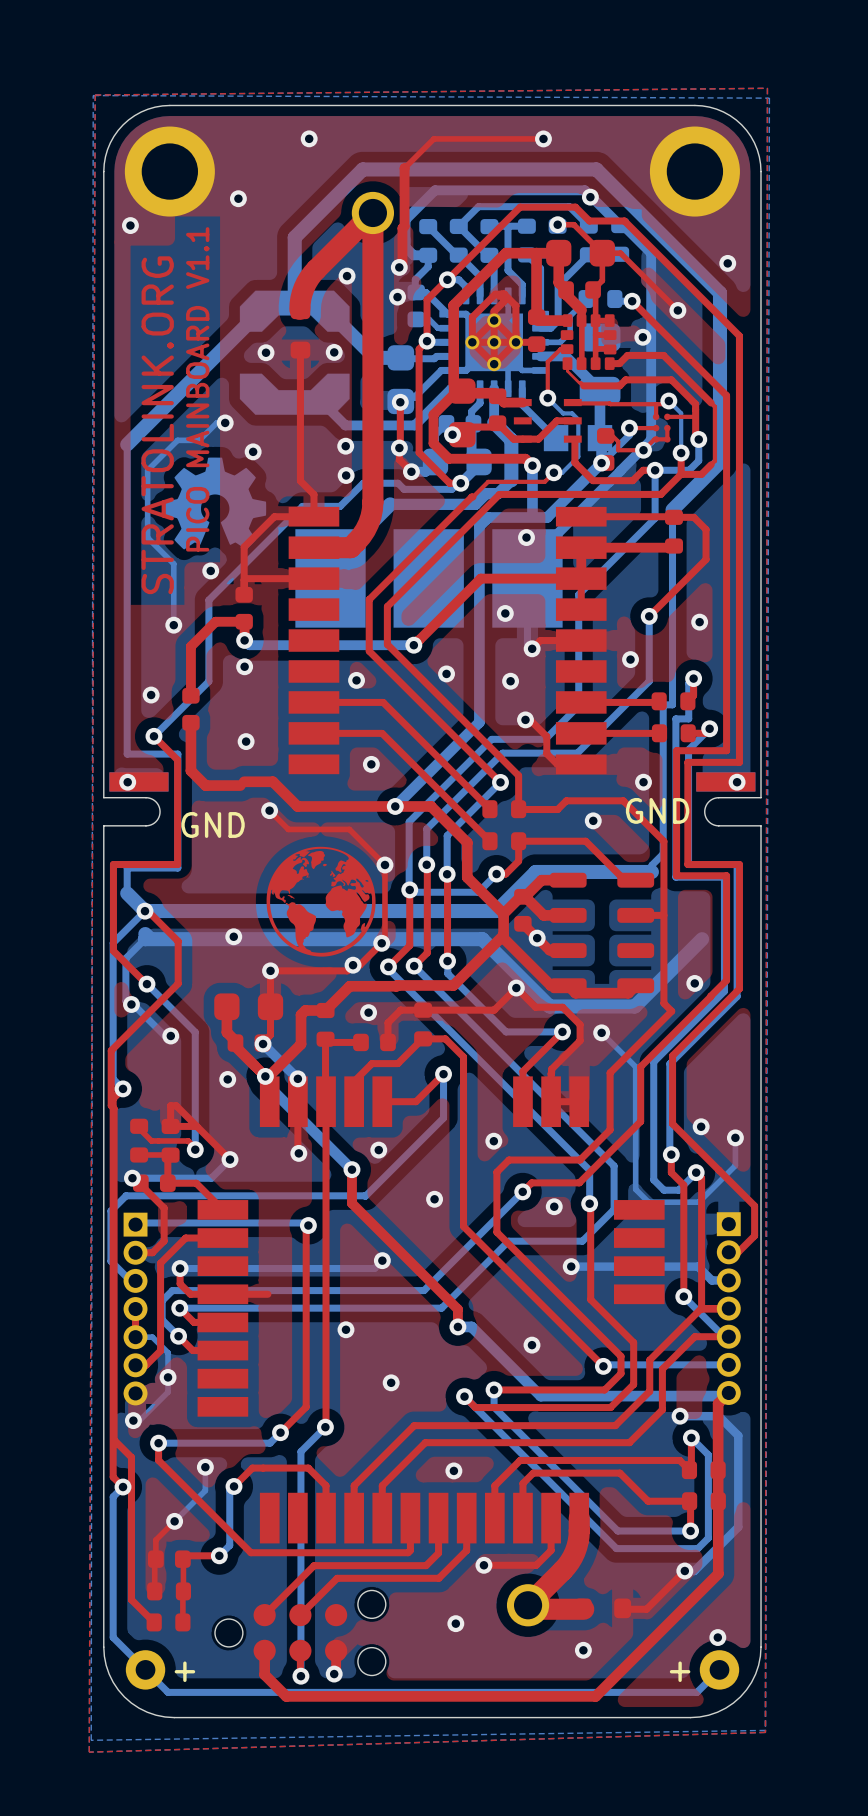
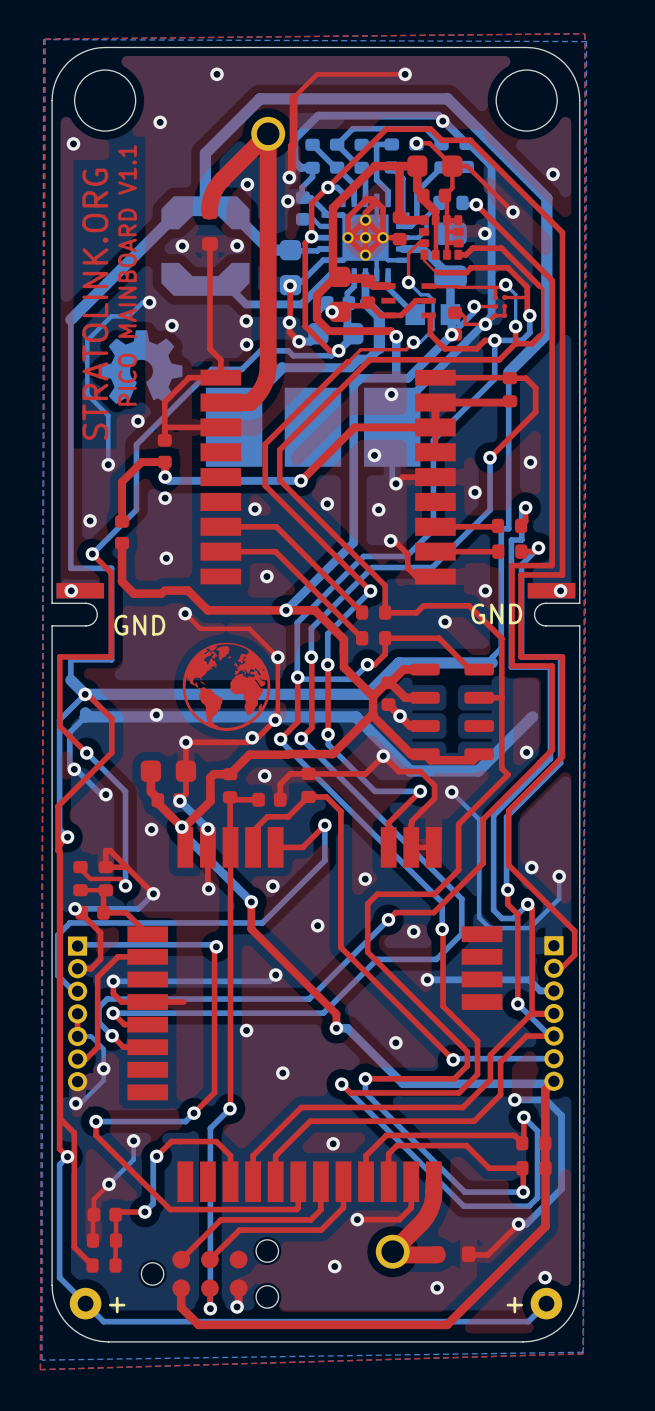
round board edge: none -> [74, 69, 137, 132]
round board edge: none -> [495, 69, 558, 132]
part: (169, 171) -> none
part: (694, 171) -> none

